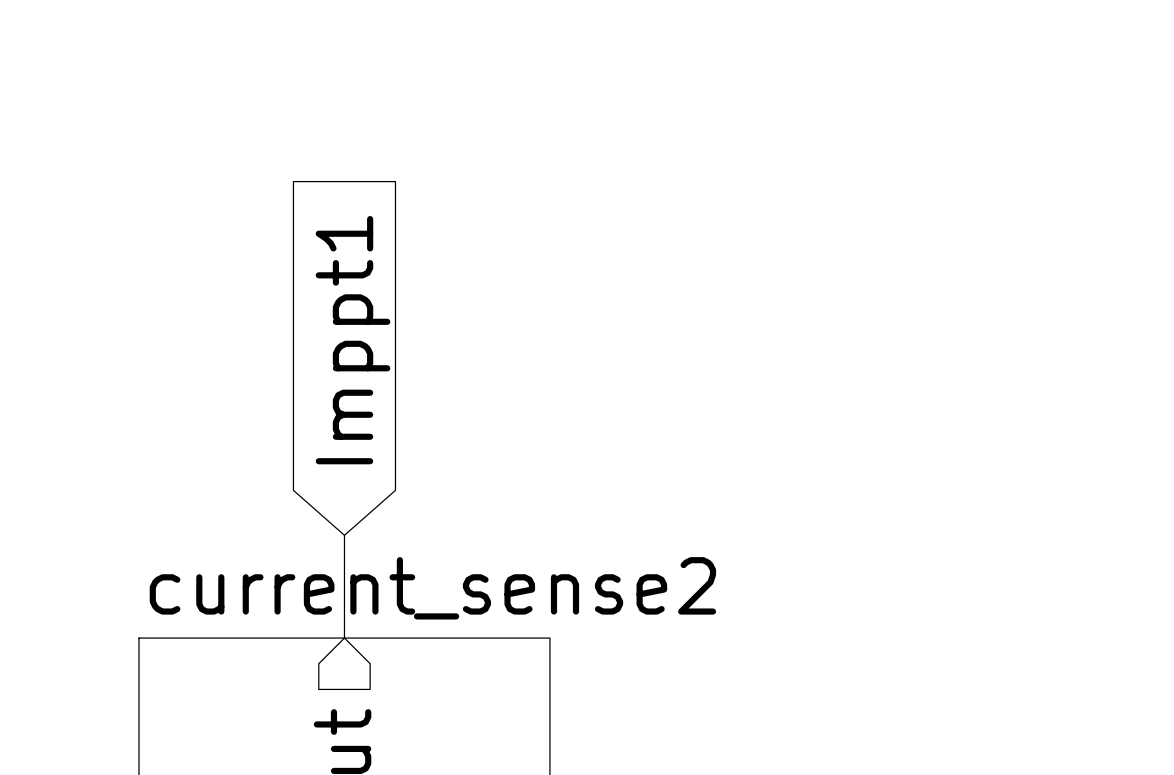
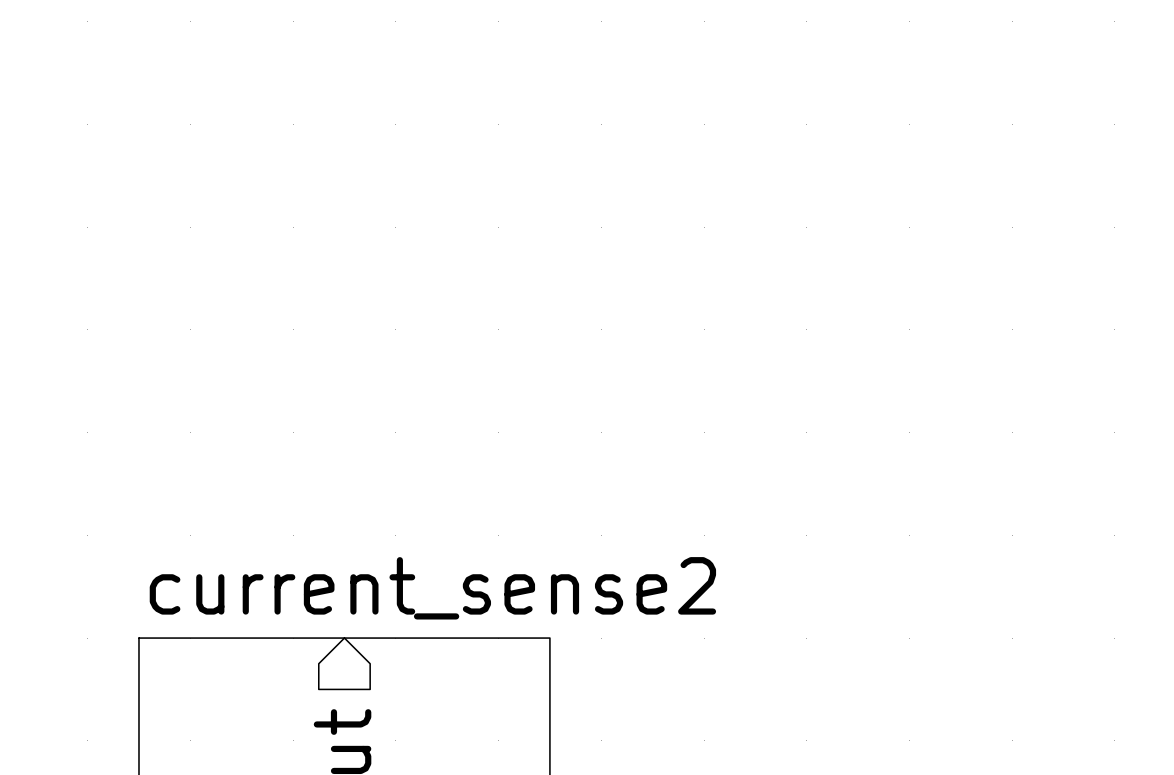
global label: Imppt1 (353, 340) -> none
wire: (344, 535) (344, 638) -> none

